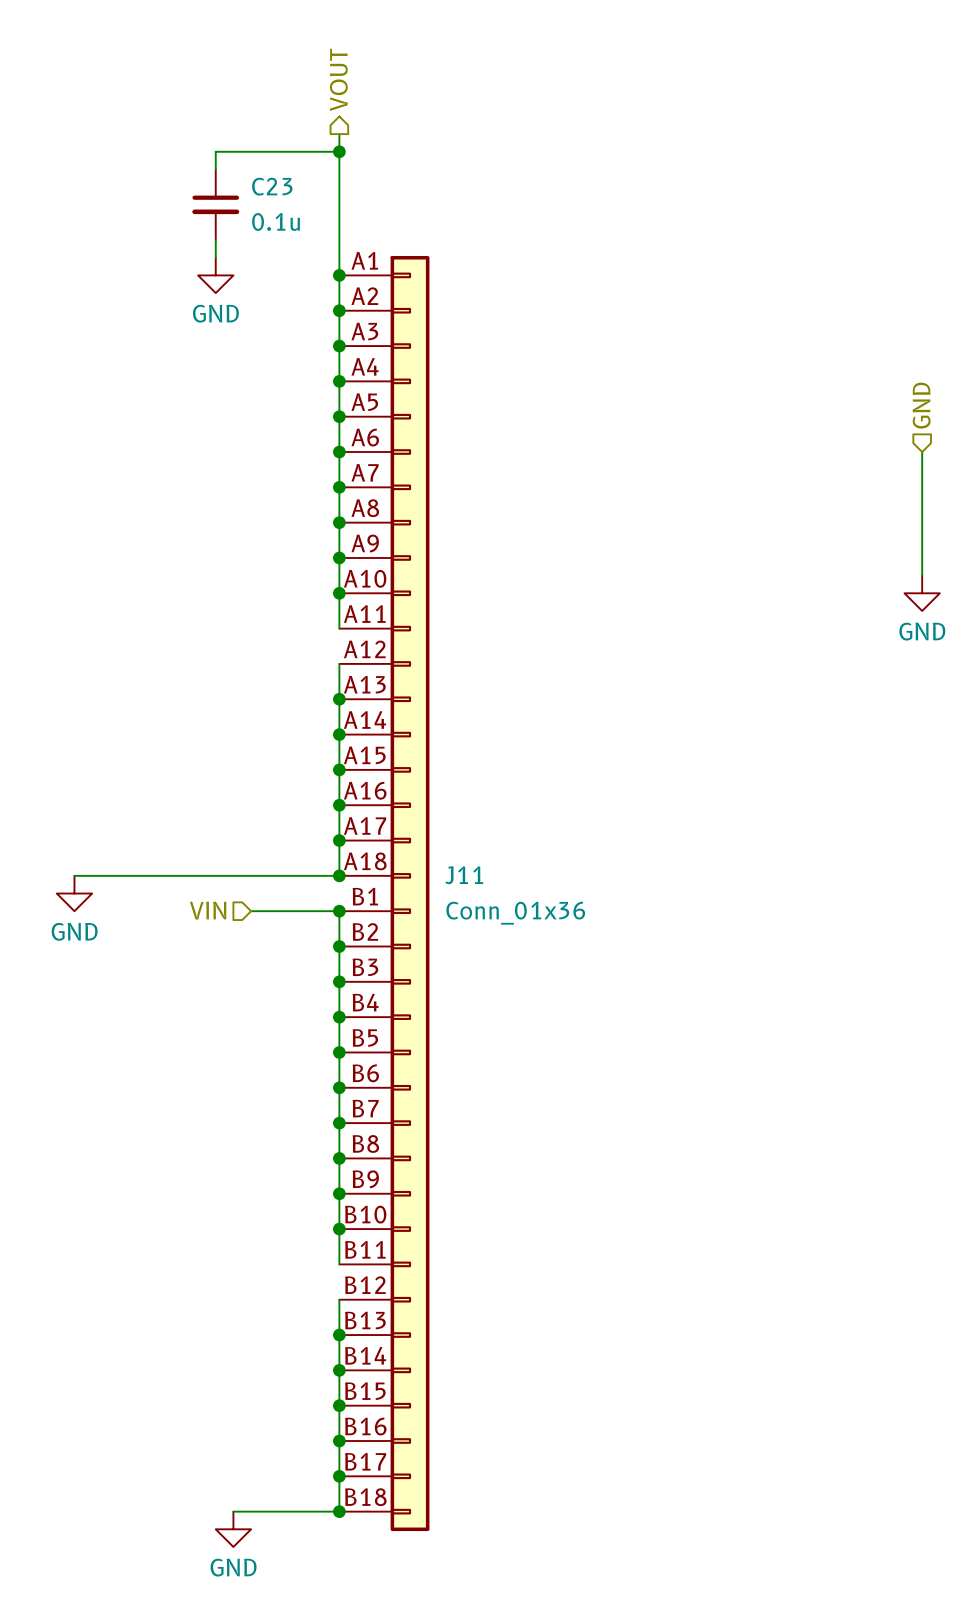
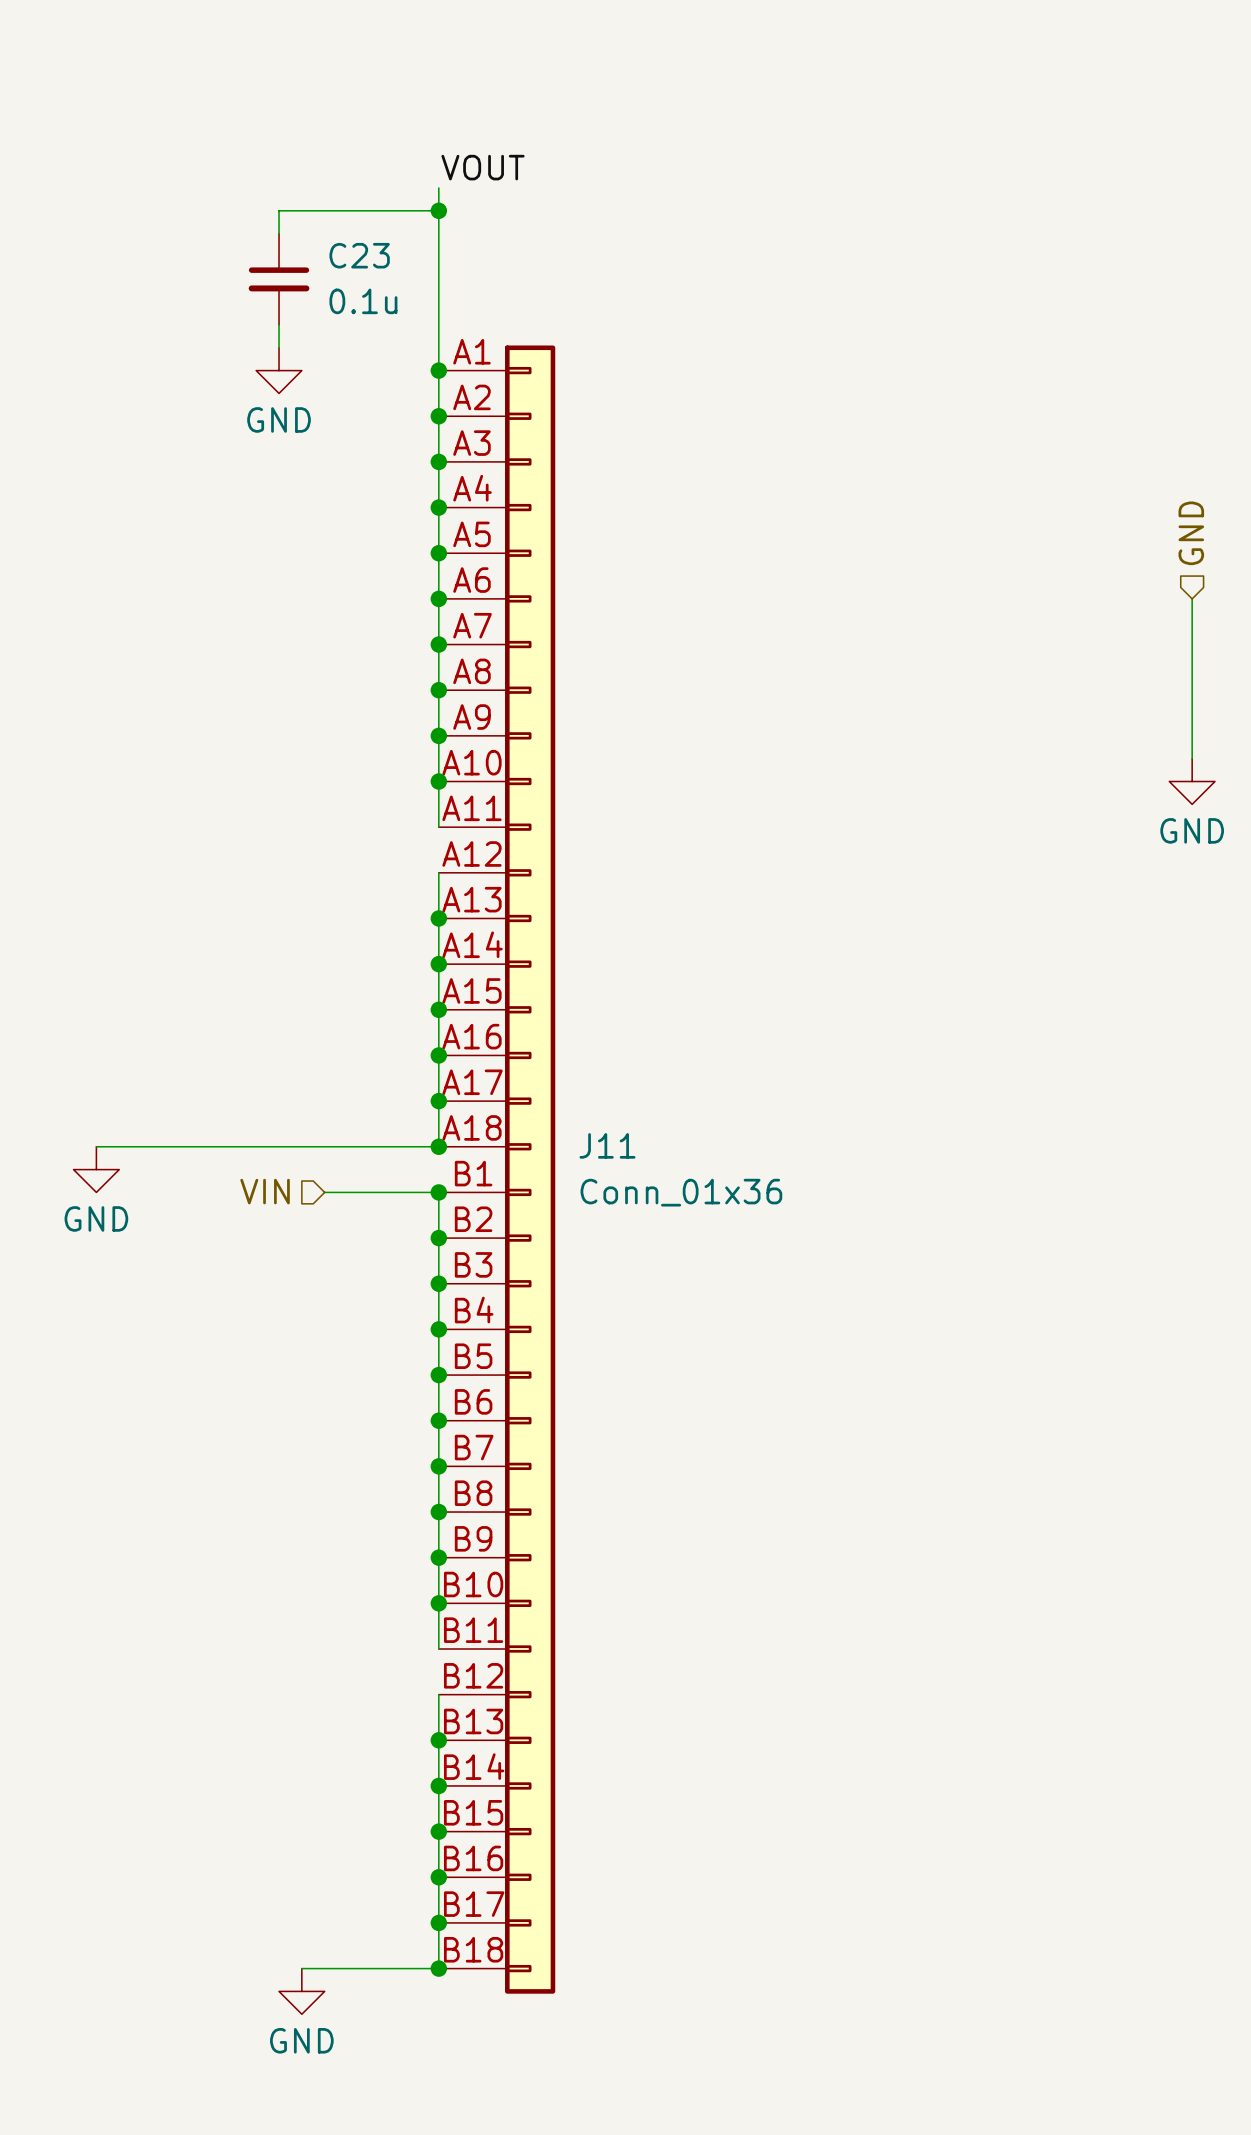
hierarchical label: VOUT (338, 79) -> none
label: none -> VOUT (483, 167)

